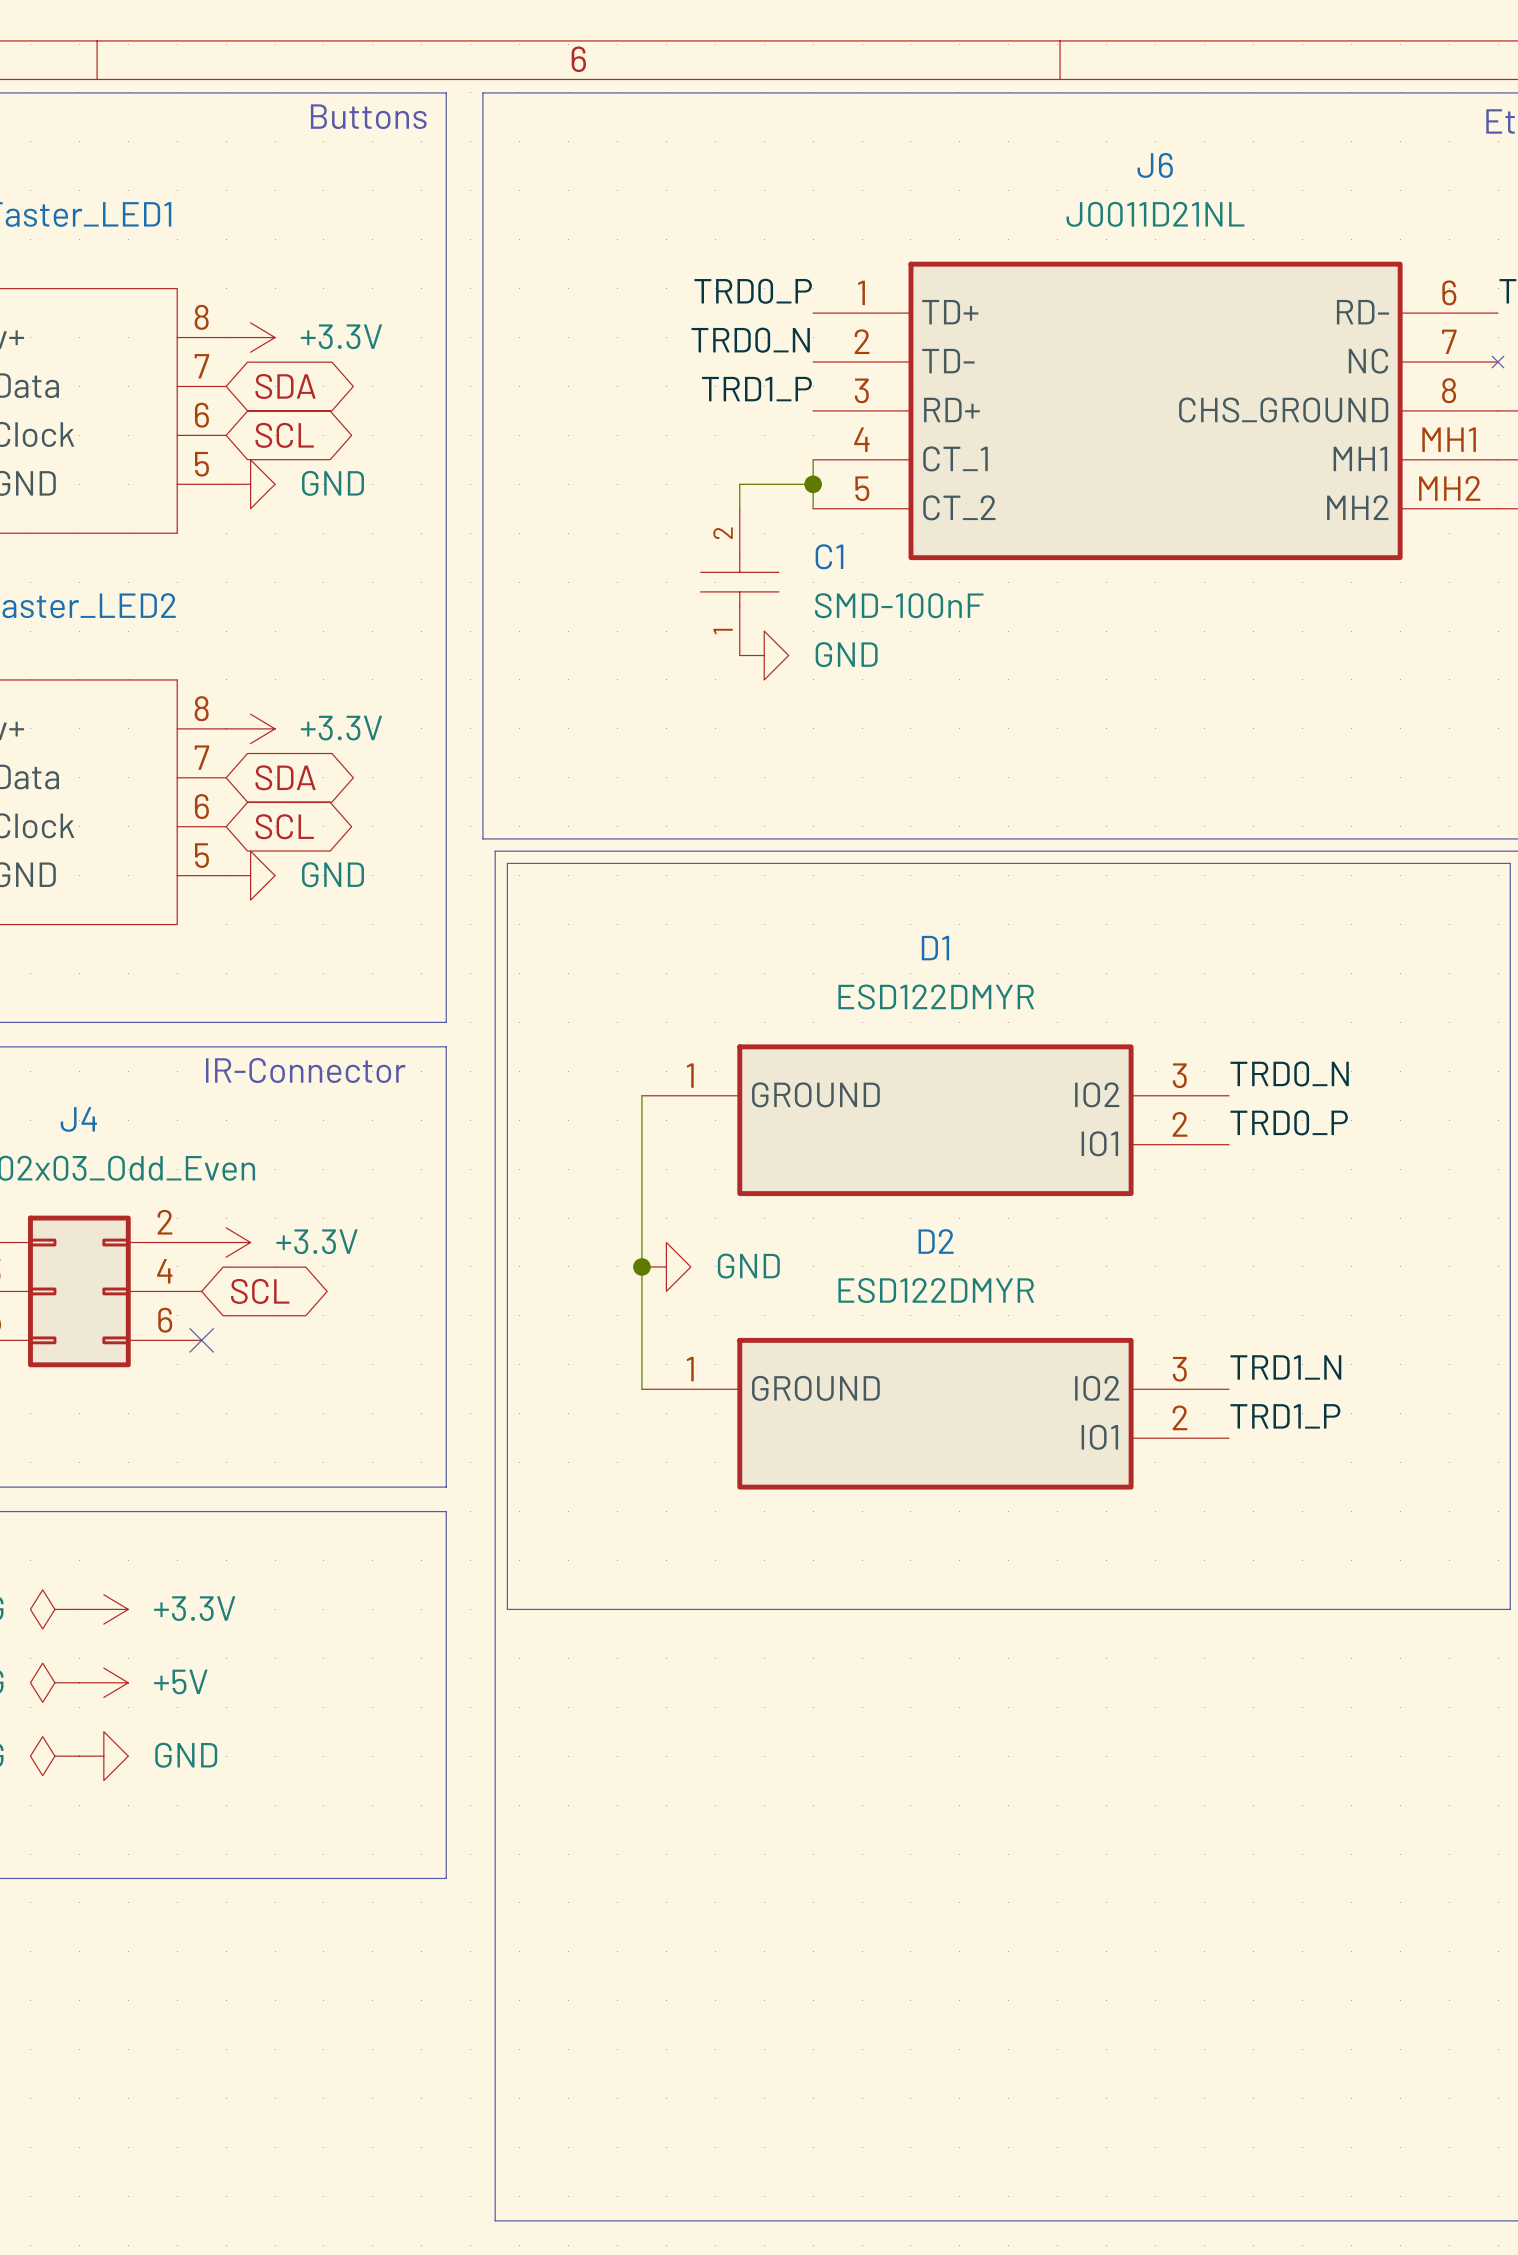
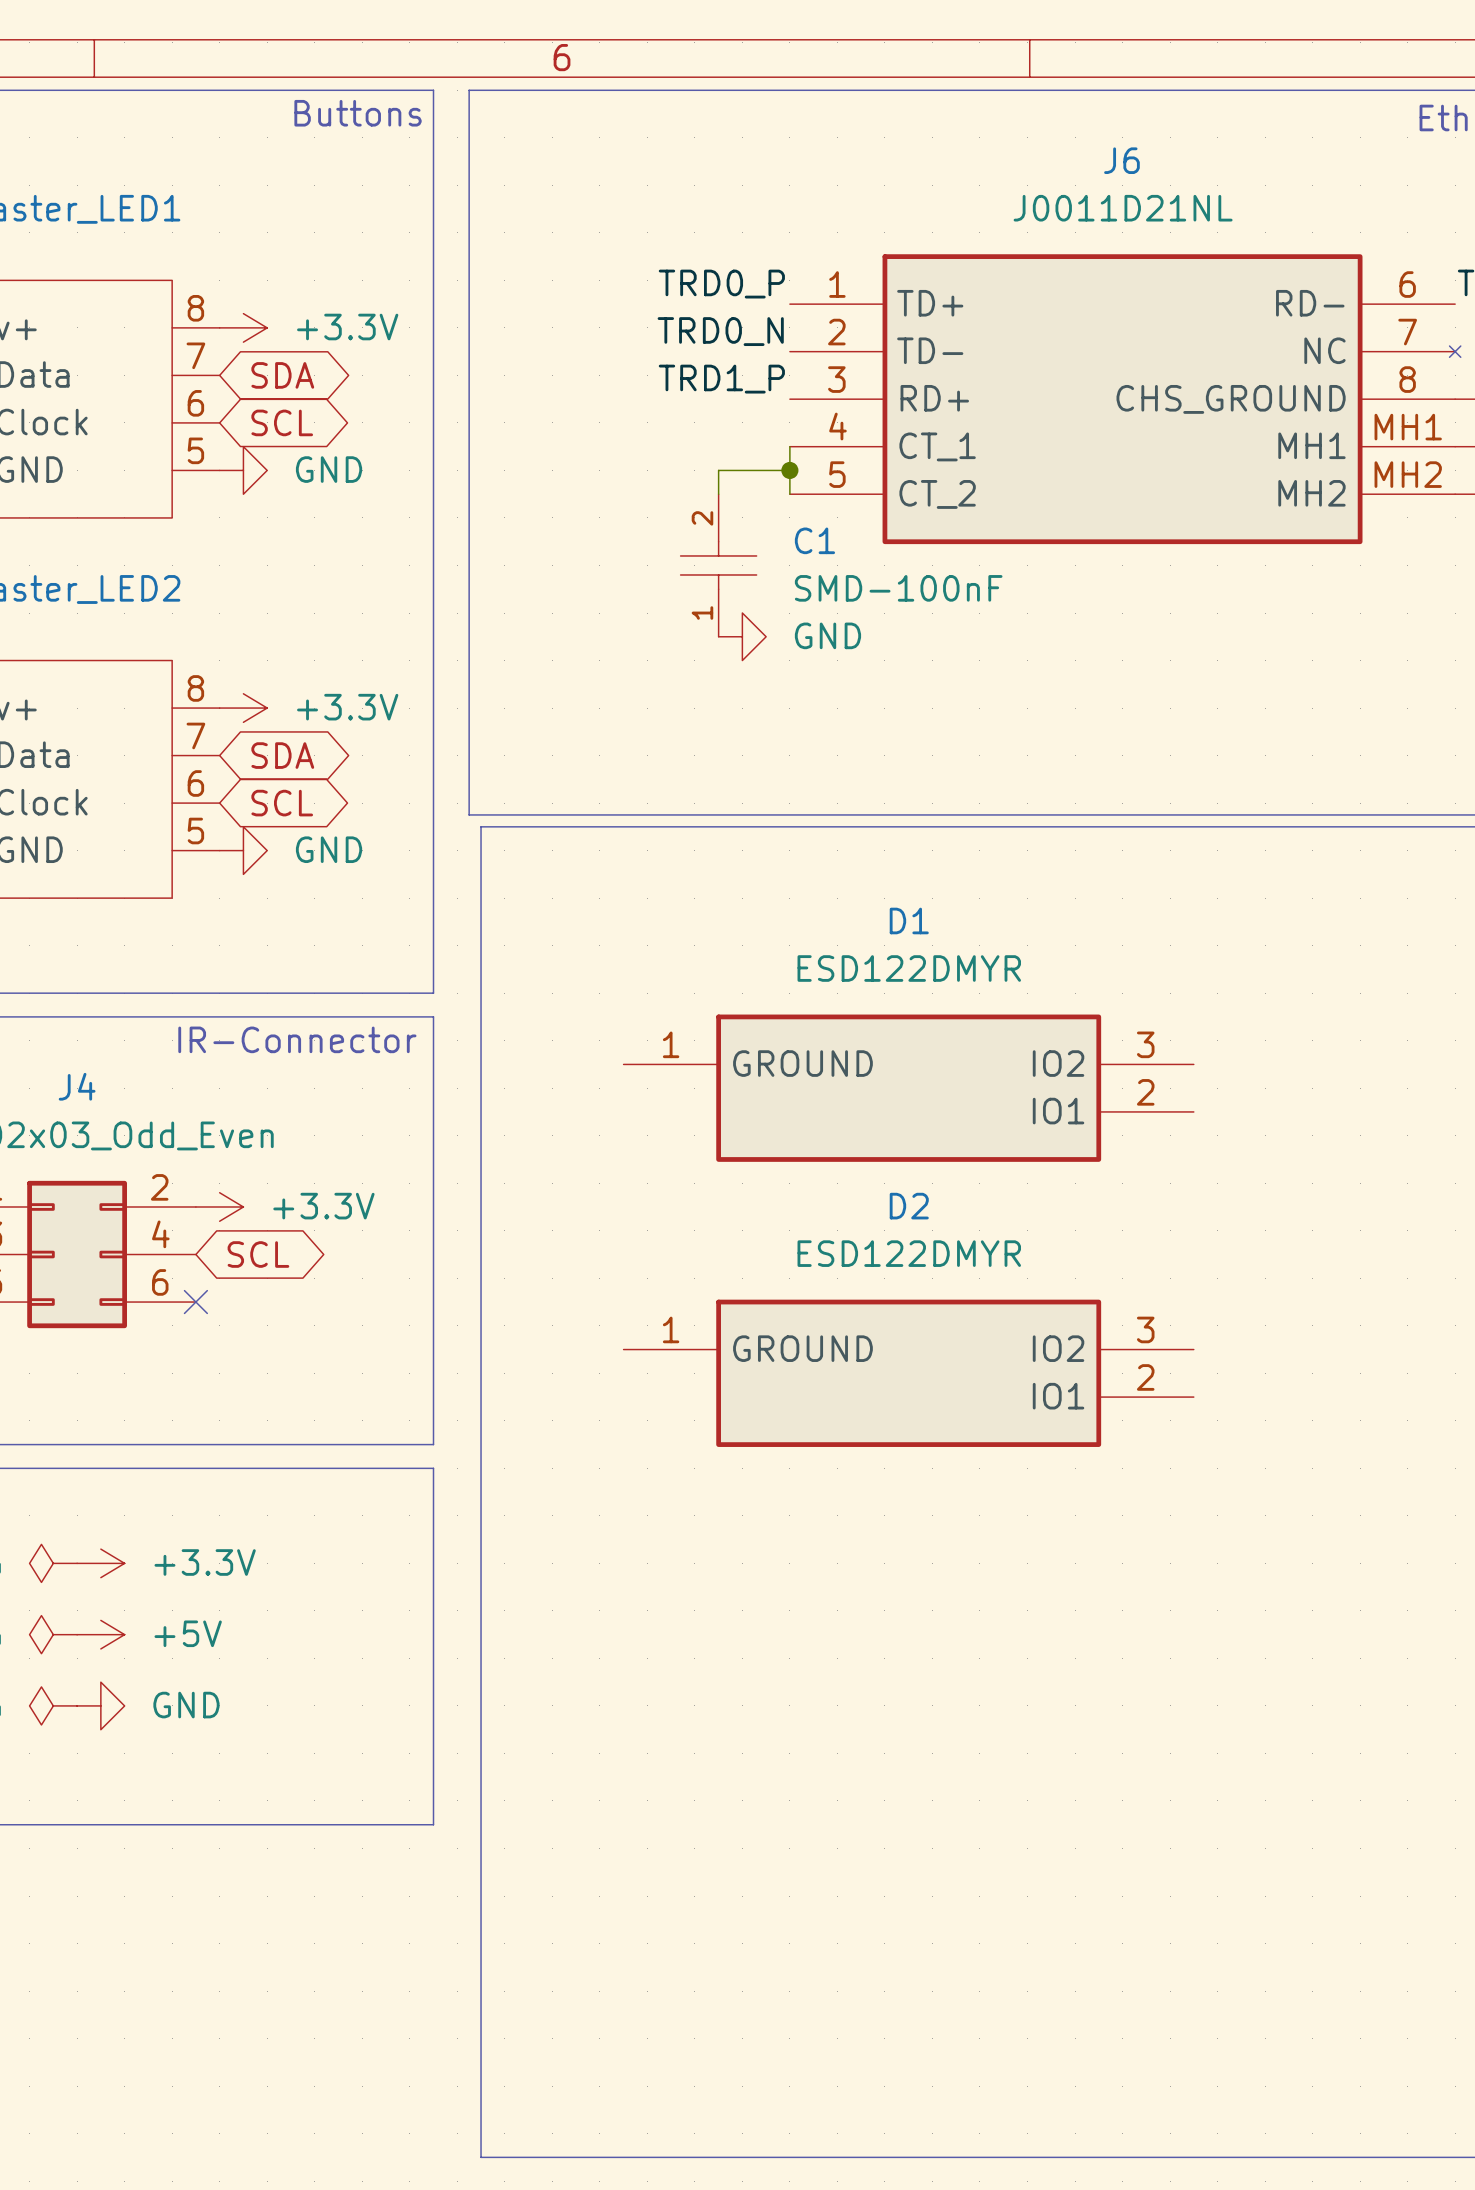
line: (507, 863) (1510, 863) (1510, 1609) (507, 1609) (507, 863) -> none
label: TRD0_N (1289, 1073) -> none
wire: (641, 1095) (641, 1389) -> none
label: TRD0_P (1289, 1122) -> none
junction: (641, 1266) -> none
power symbol: GND (666, 1266) -> none
label: TRD1_N (1285, 1367) -> none
label: TRD1_P (1285, 1416) -> none

